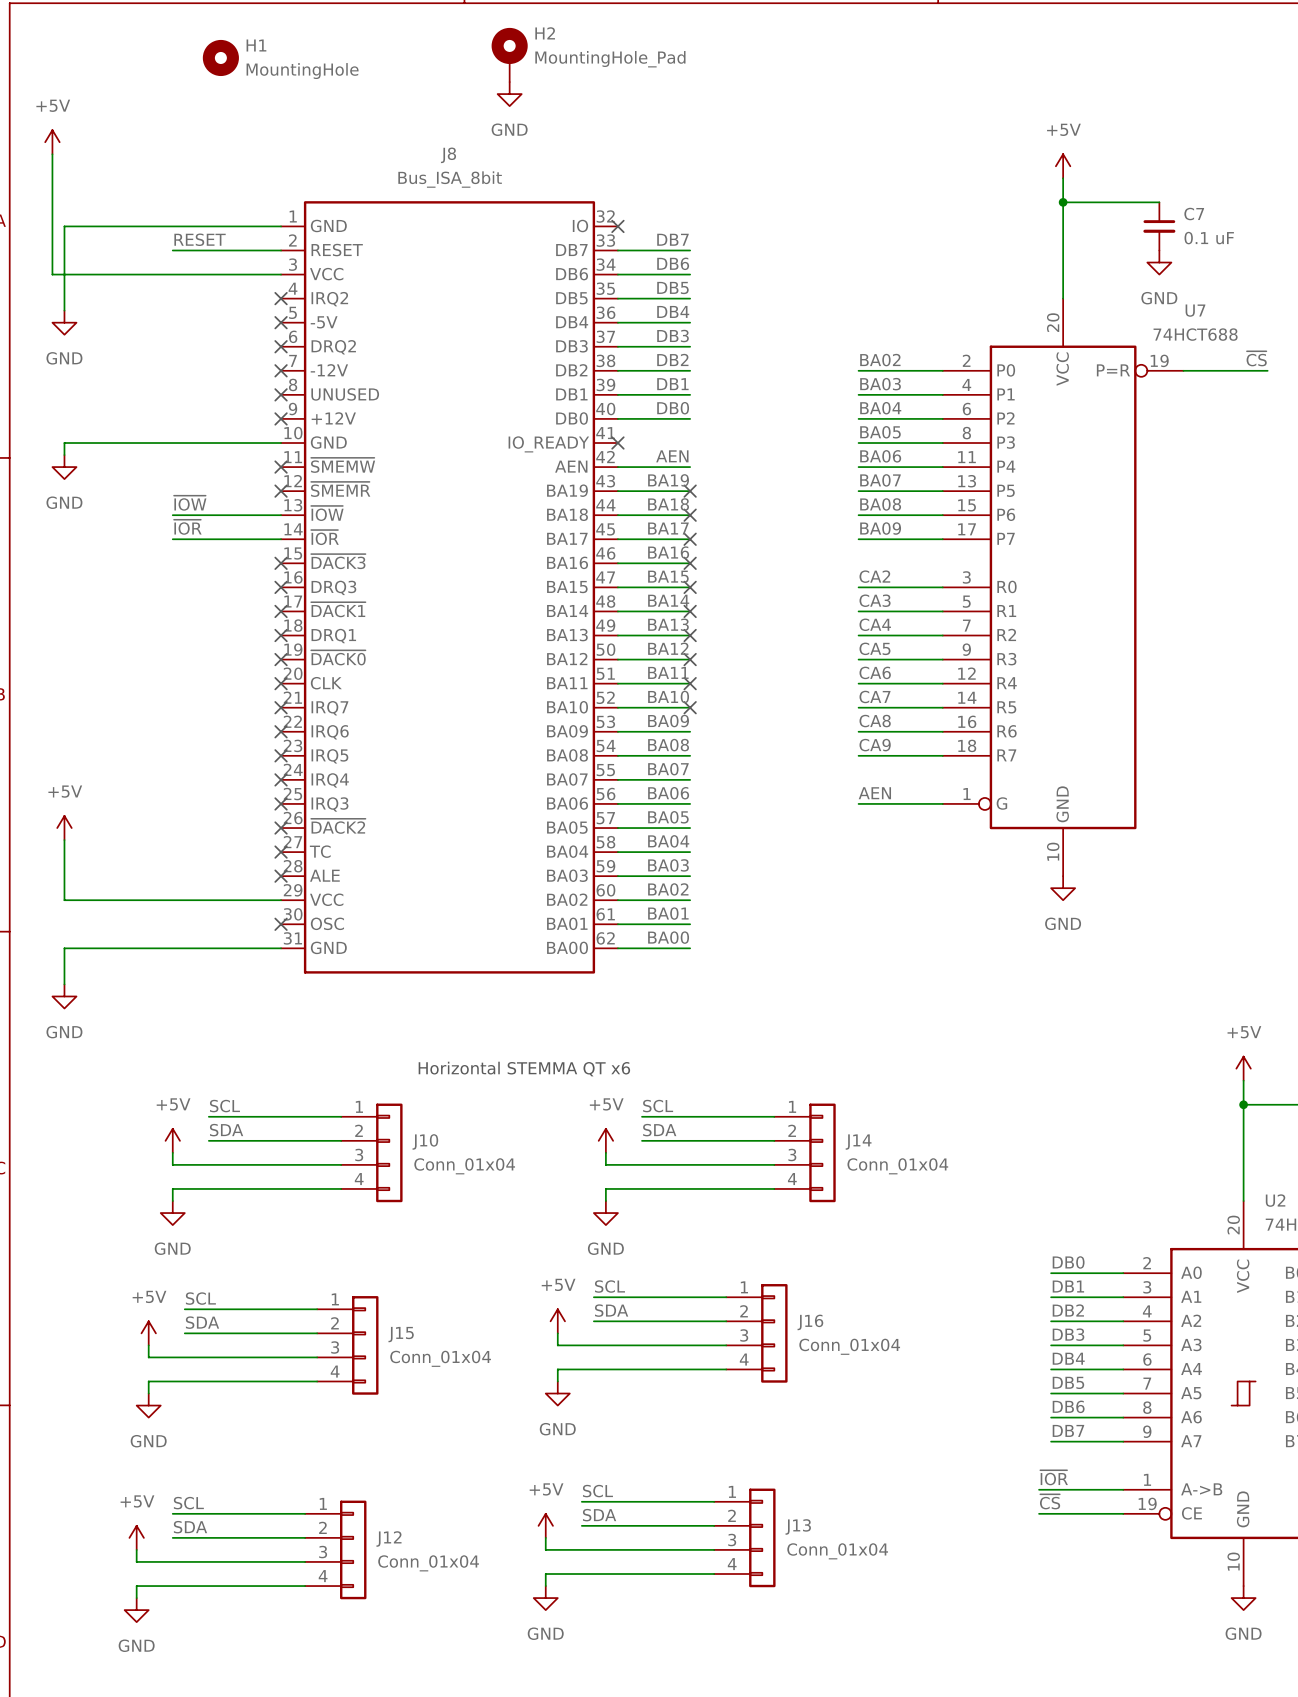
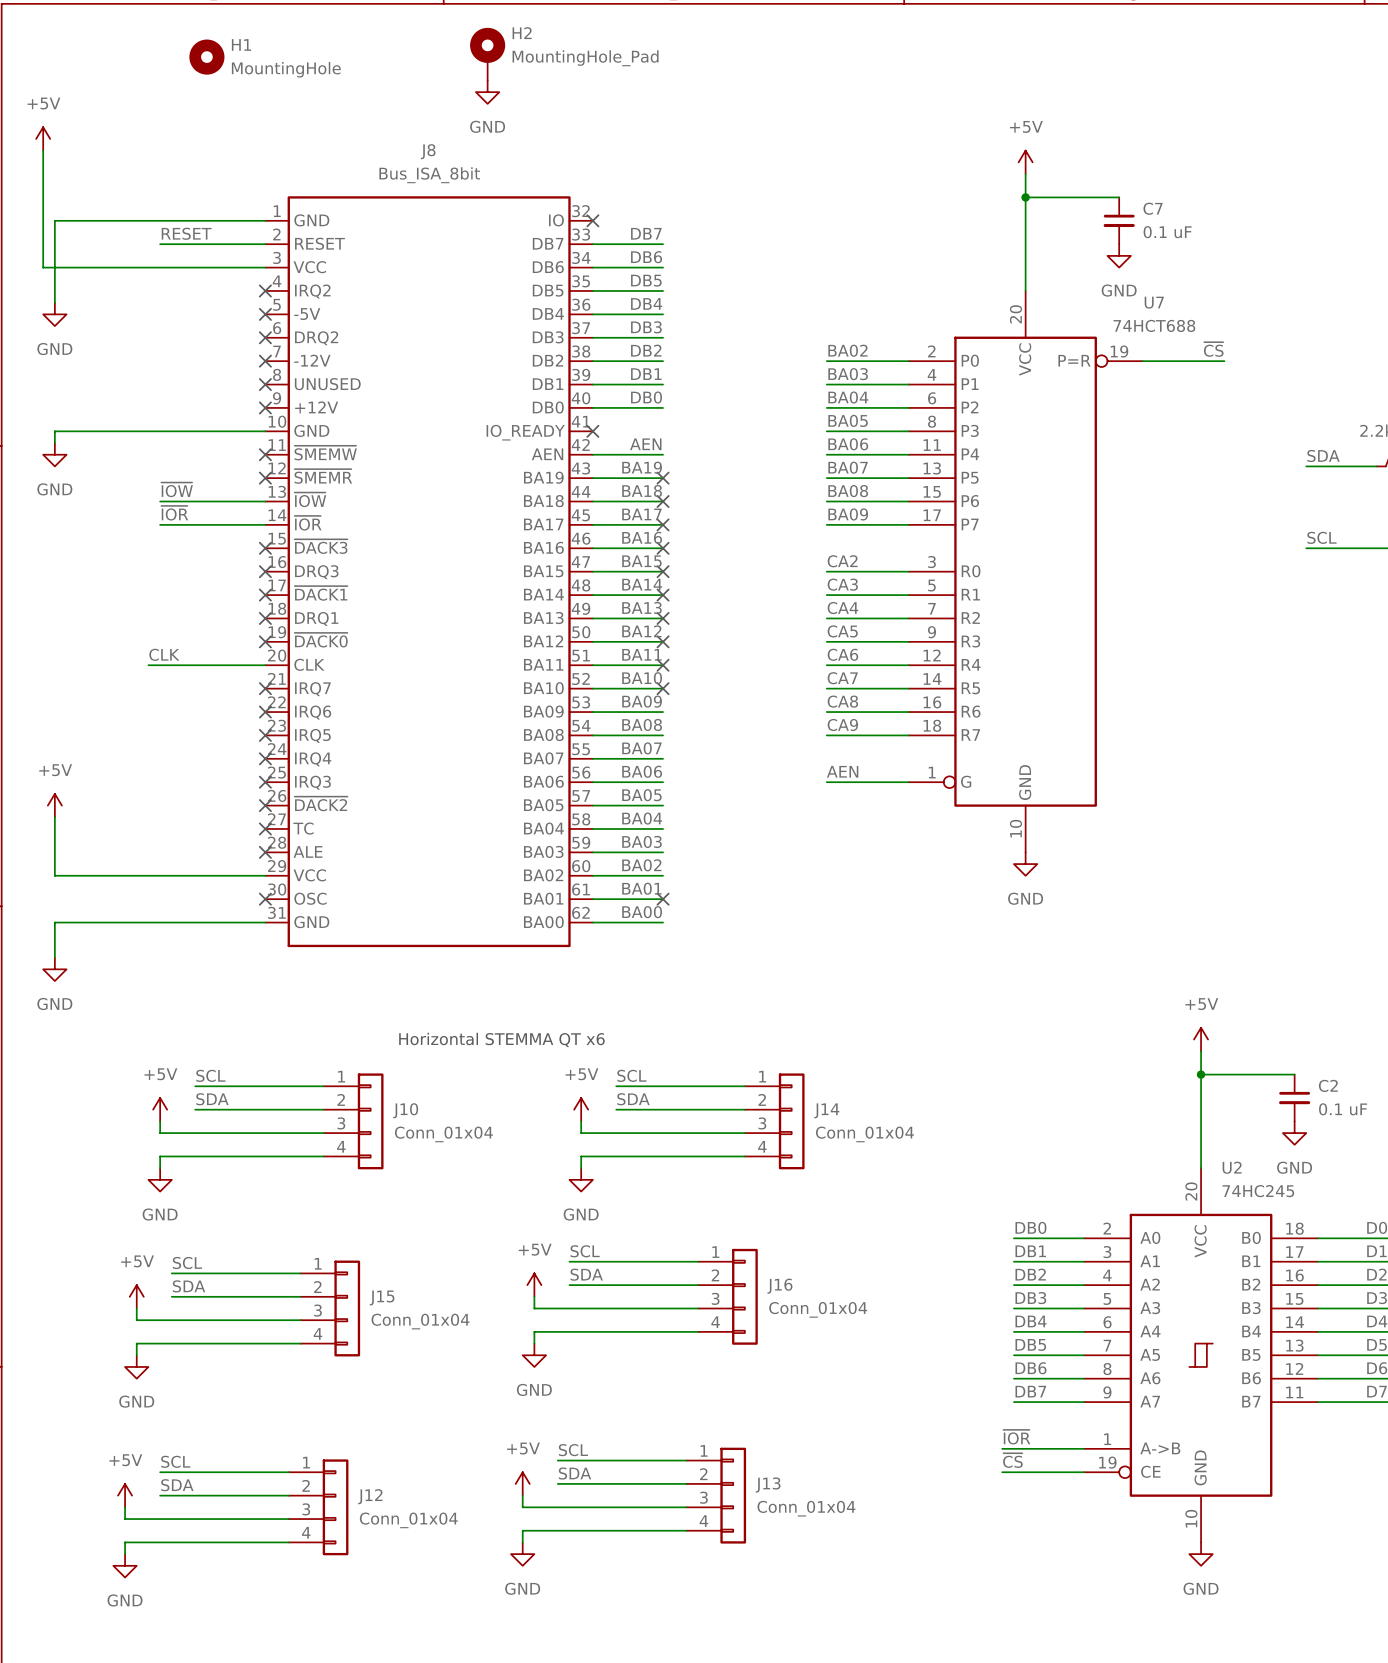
label: none -> CLK (164, 654)
wire: none -> (148, 665) (265, 665)
no-connect mark: (281, 683) -> none
no-connect mark: none -> (663, 899)

